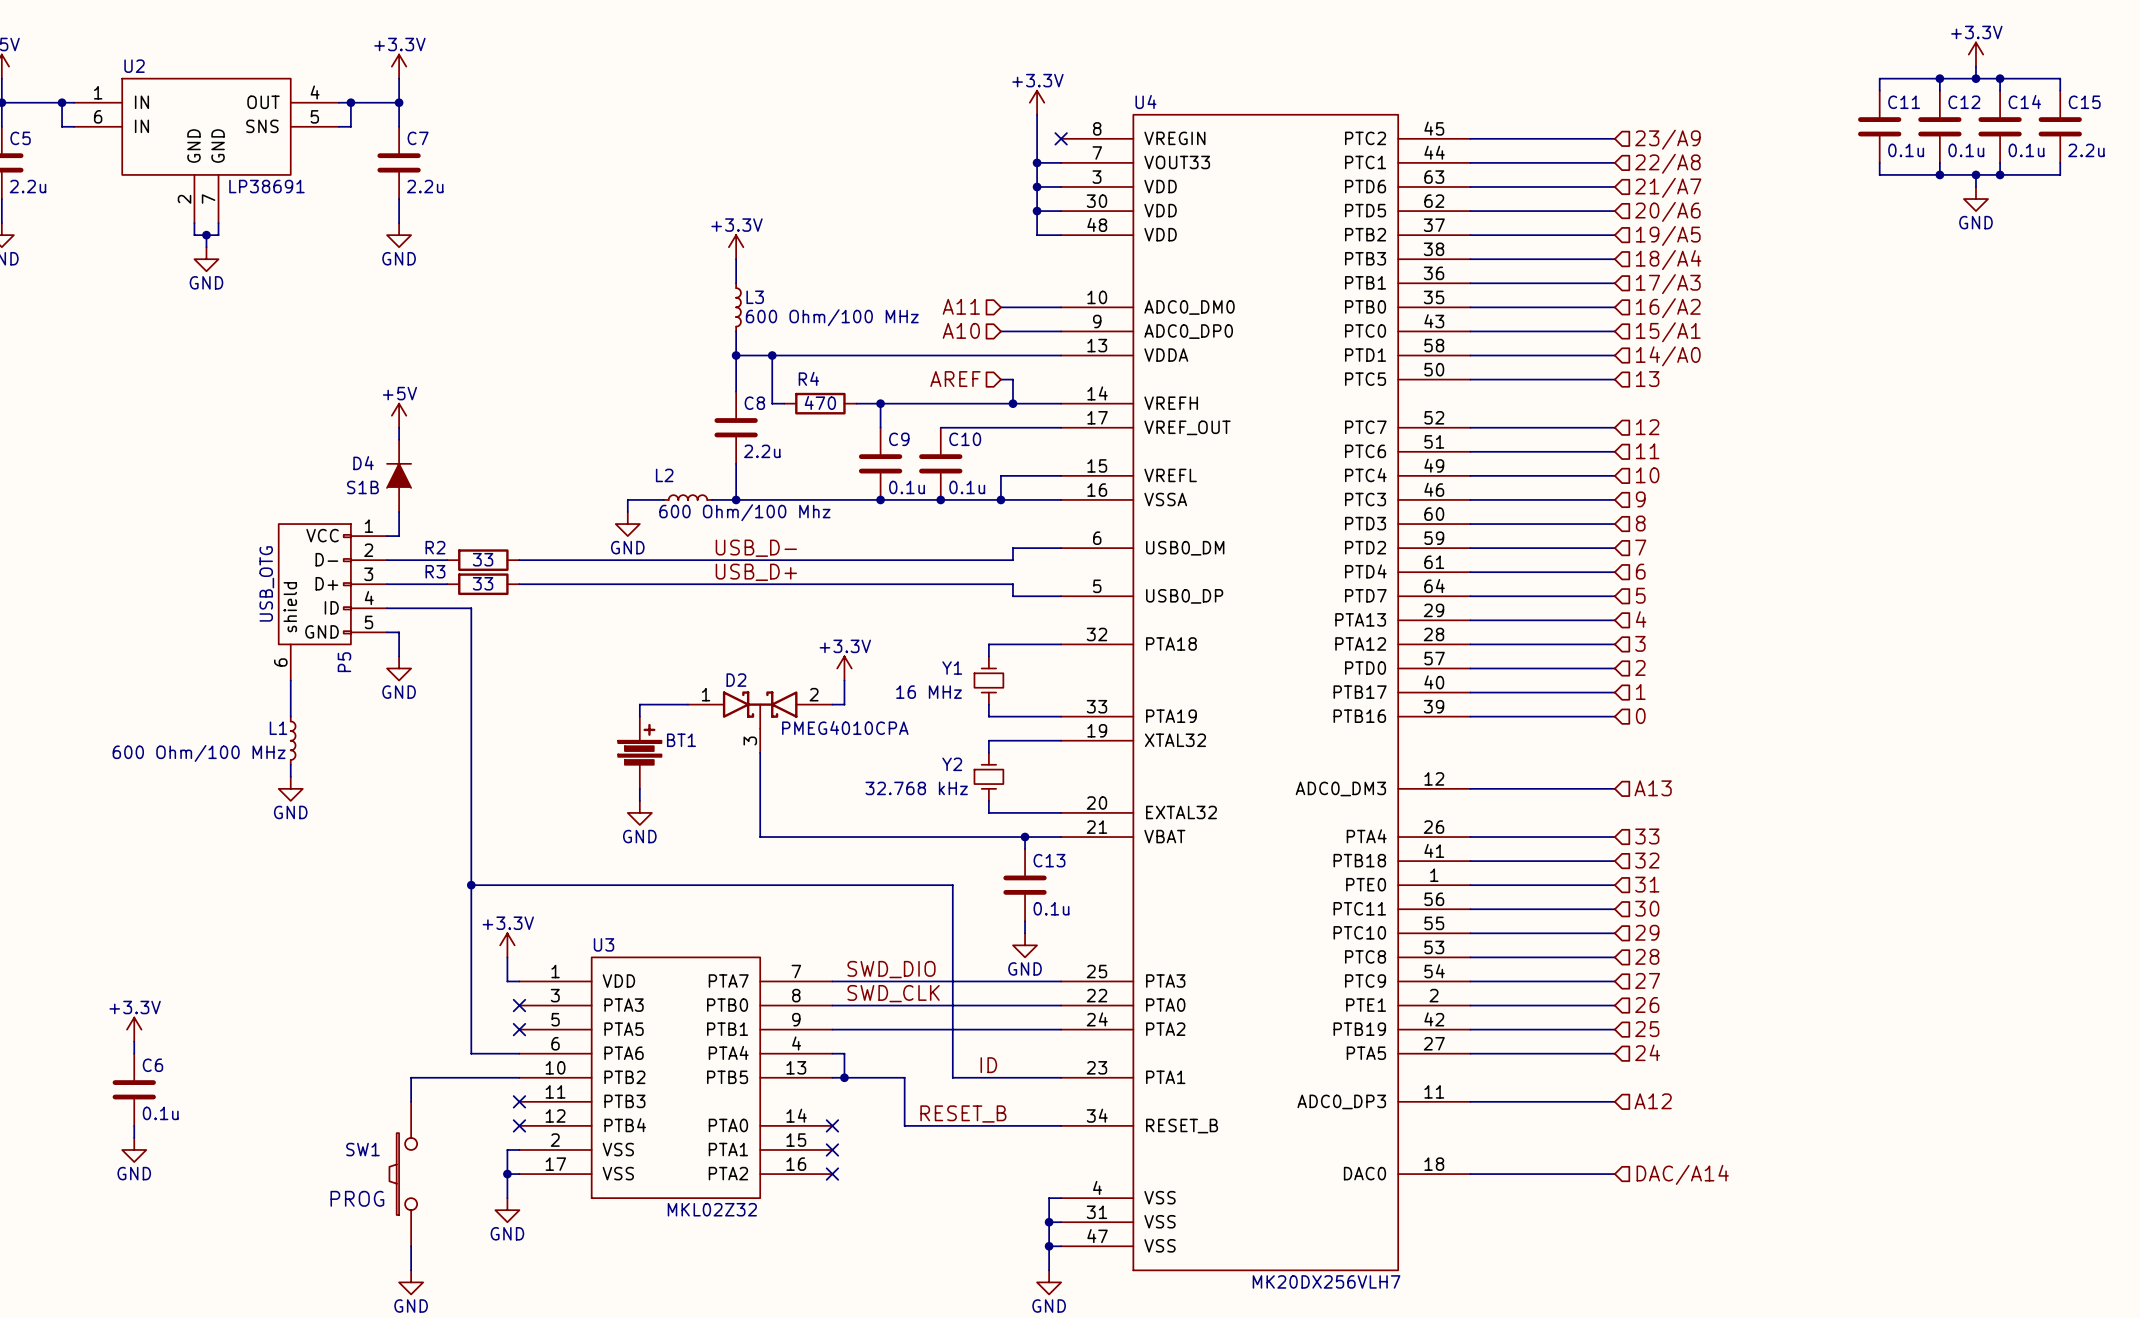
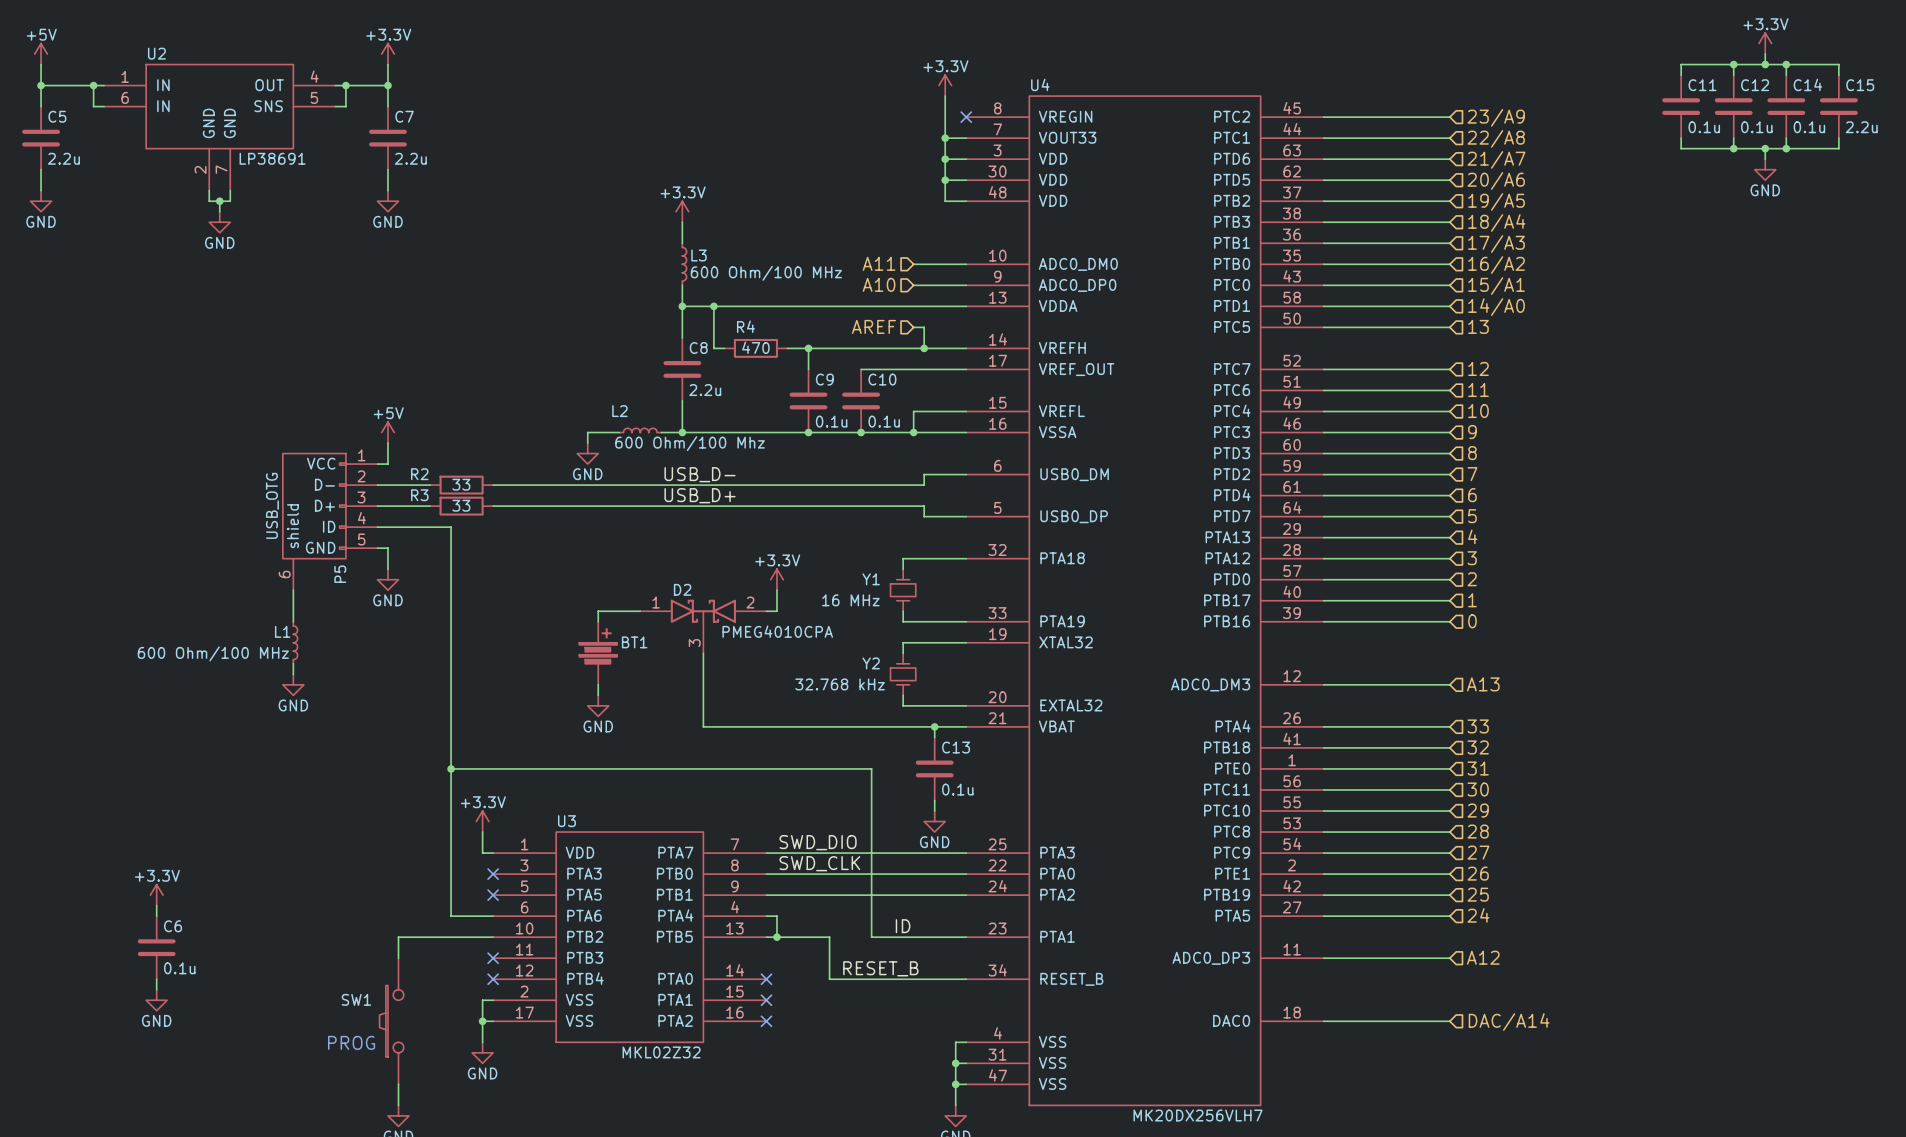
power symbol position: +5V (399, 415) -> +5V (387, 432)
wire: (399, 427) (399, 439) -> none
D4: S1B (399, 475) -> none

